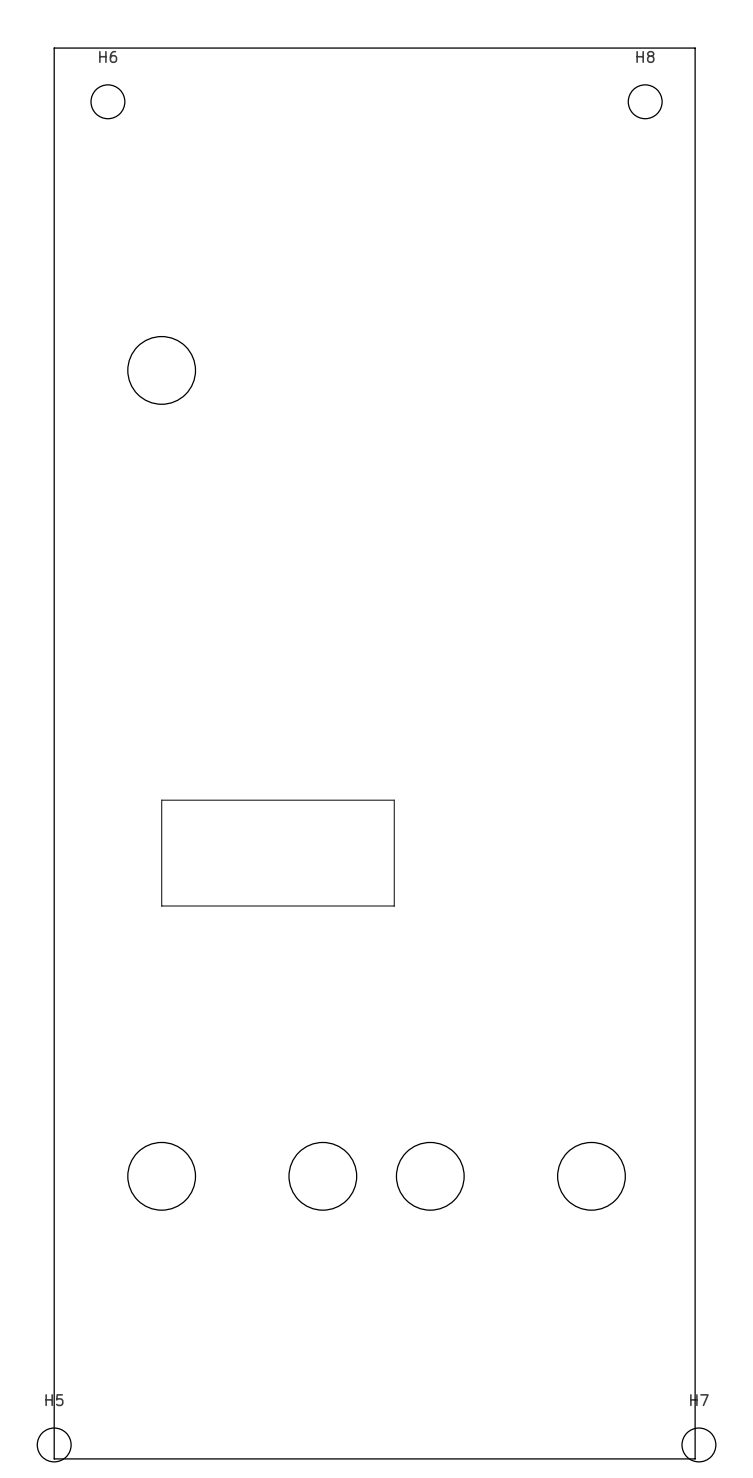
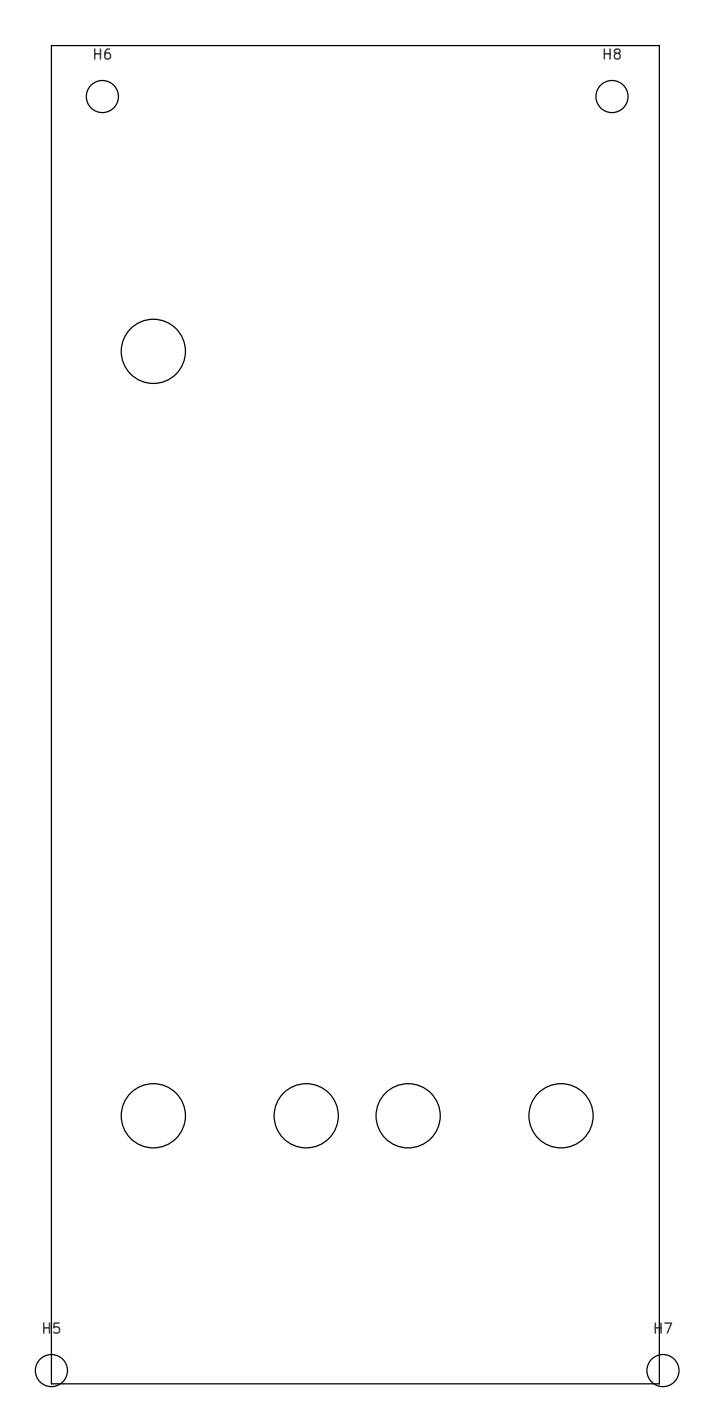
line: (161, 800) (161, 905) (394, 905) (394, 800) (161, 800) -> none

